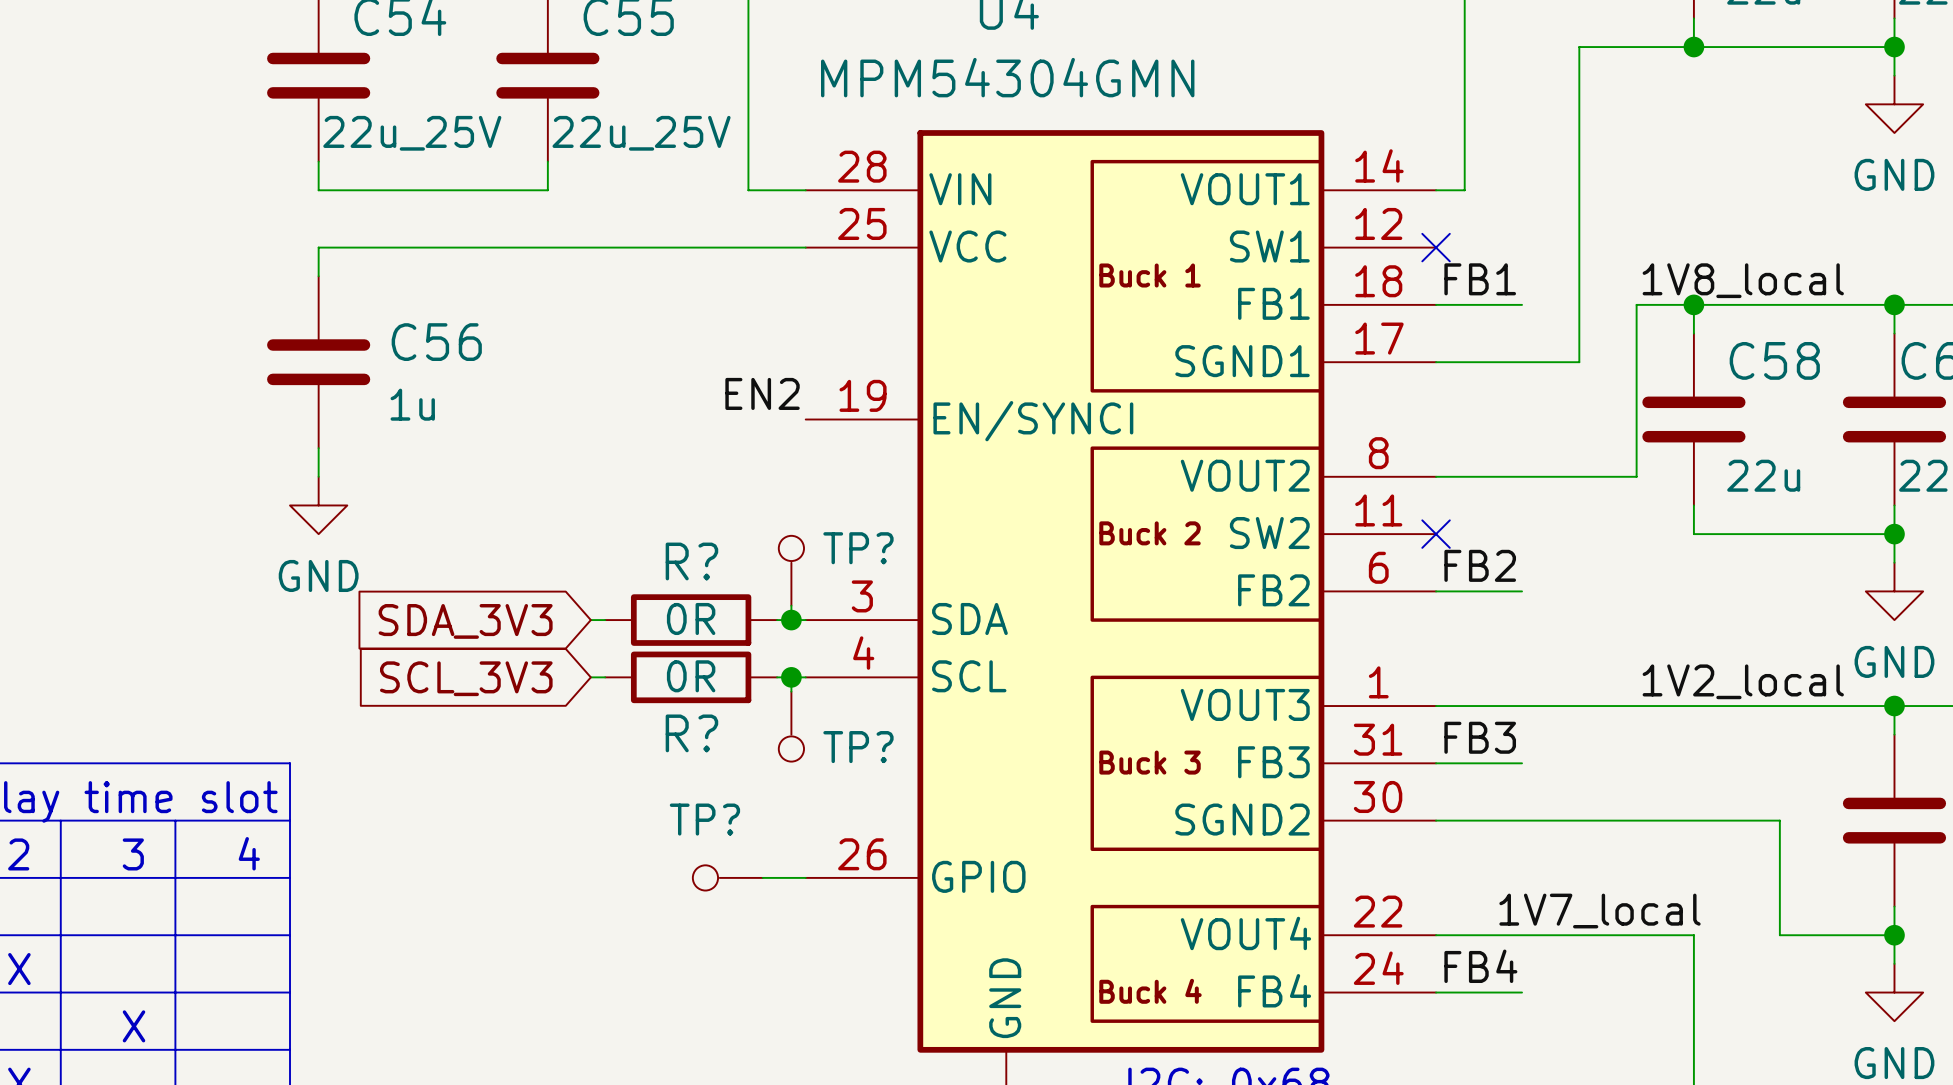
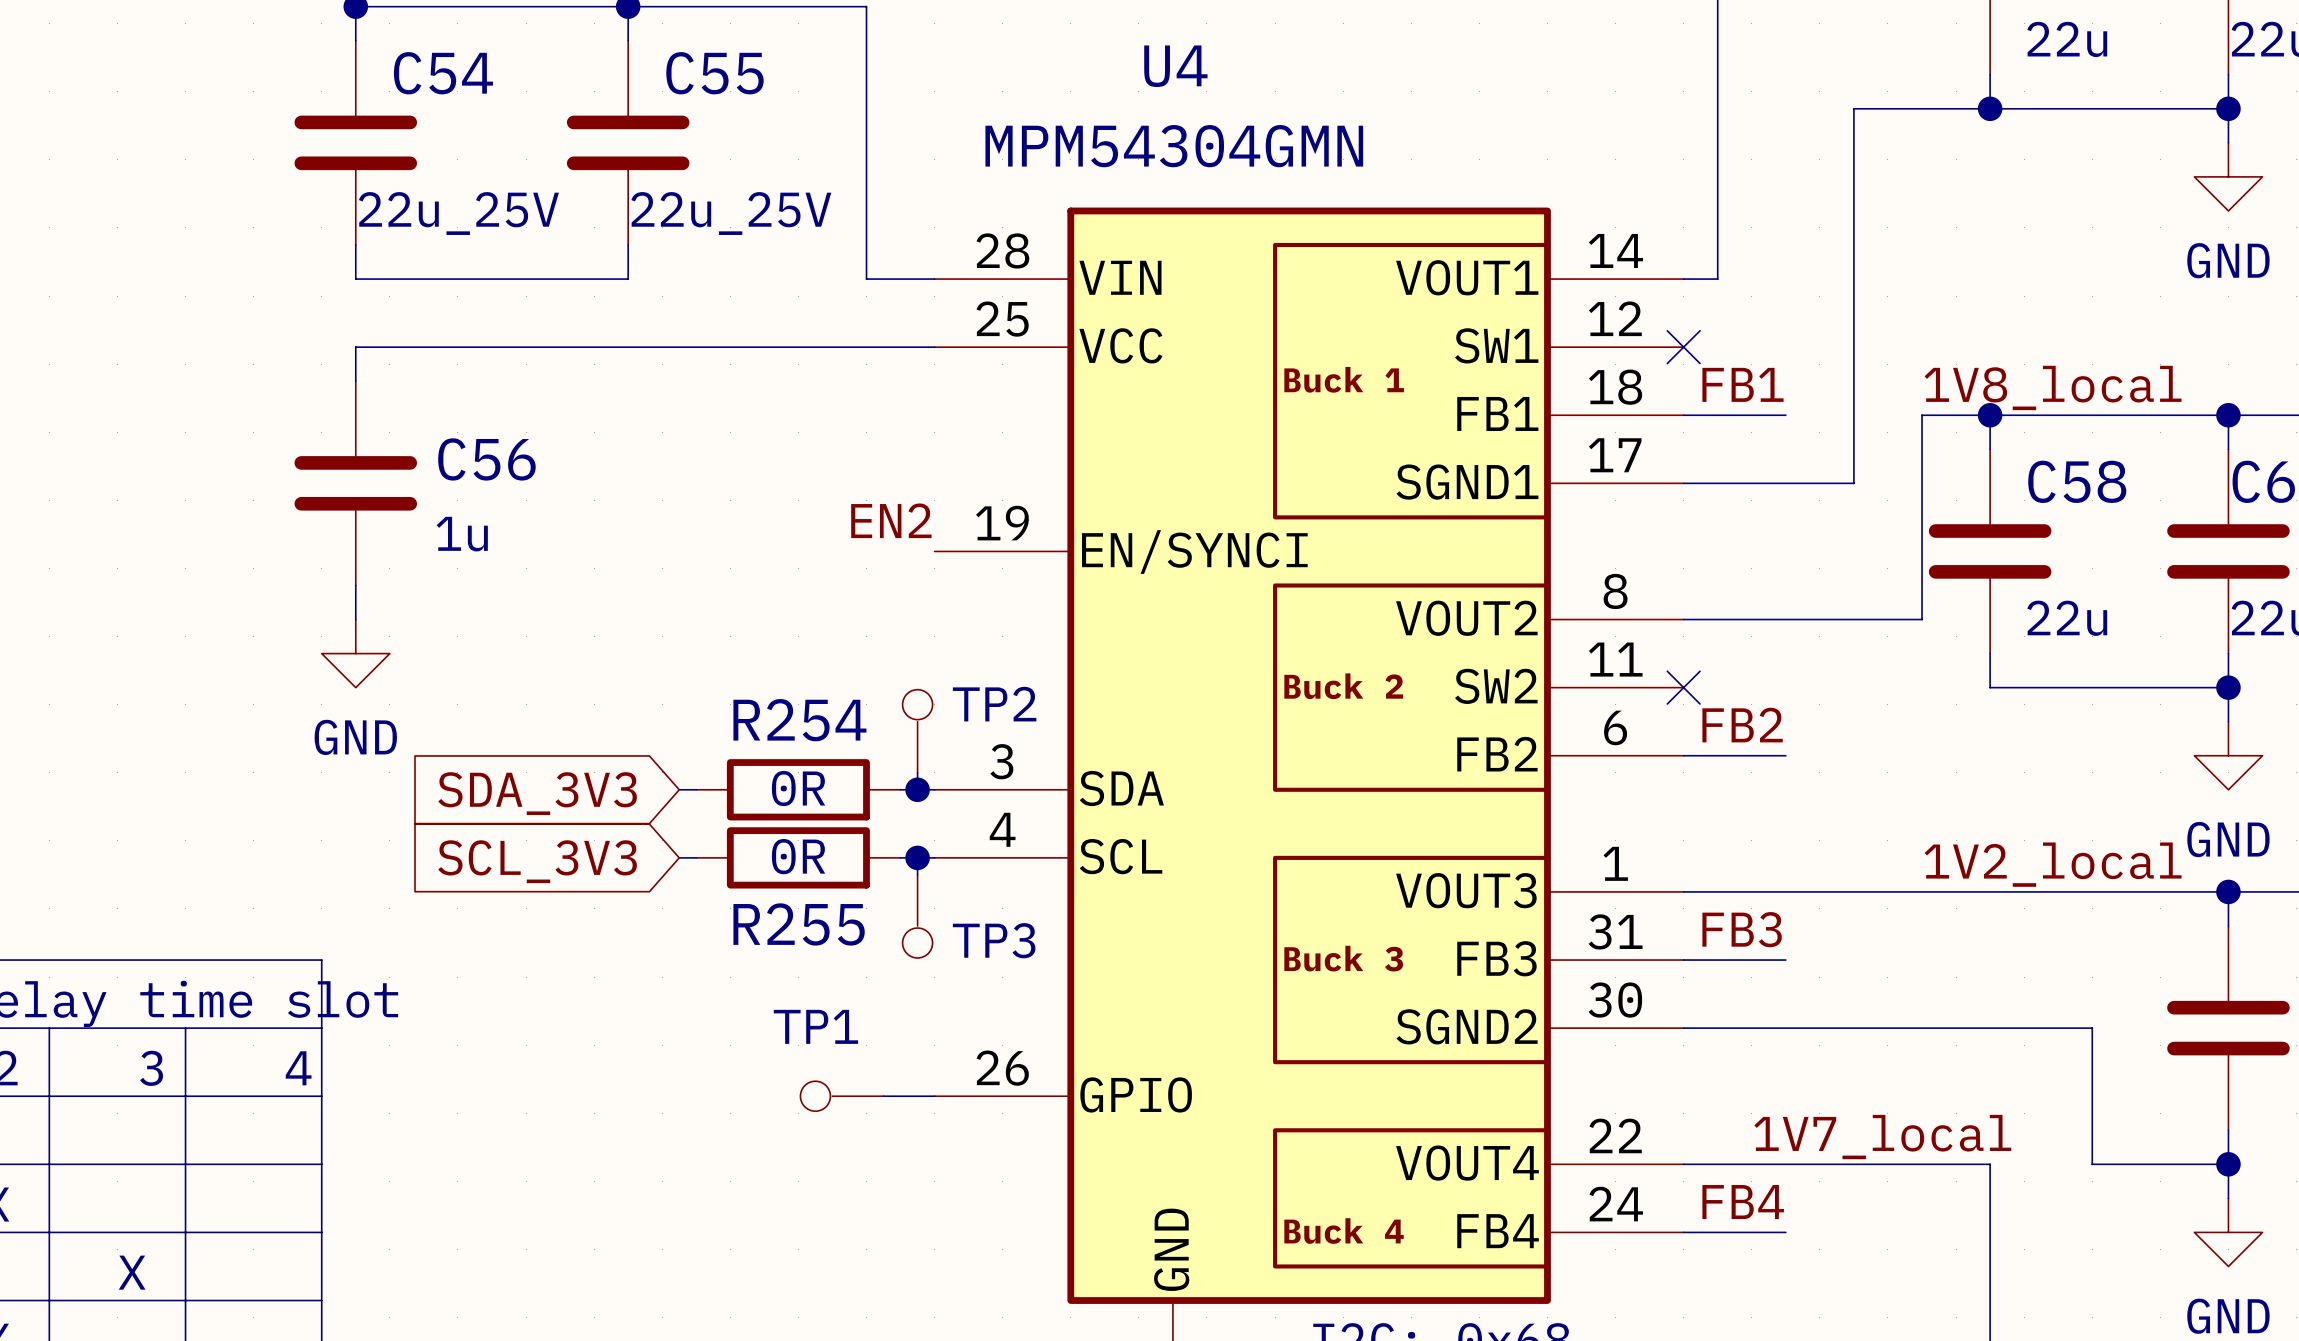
TP? name: TP? (858, 548) -> TP2 (994, 704)
R? name: R? (691, 561) -> R254 (799, 720)
R? name: R? (691, 733) -> R255 (799, 924)
TP? name: TP? (858, 747) -> TP3 (994, 940)
TP? name: TP? (704, 819) -> TP1 (815, 1026)

